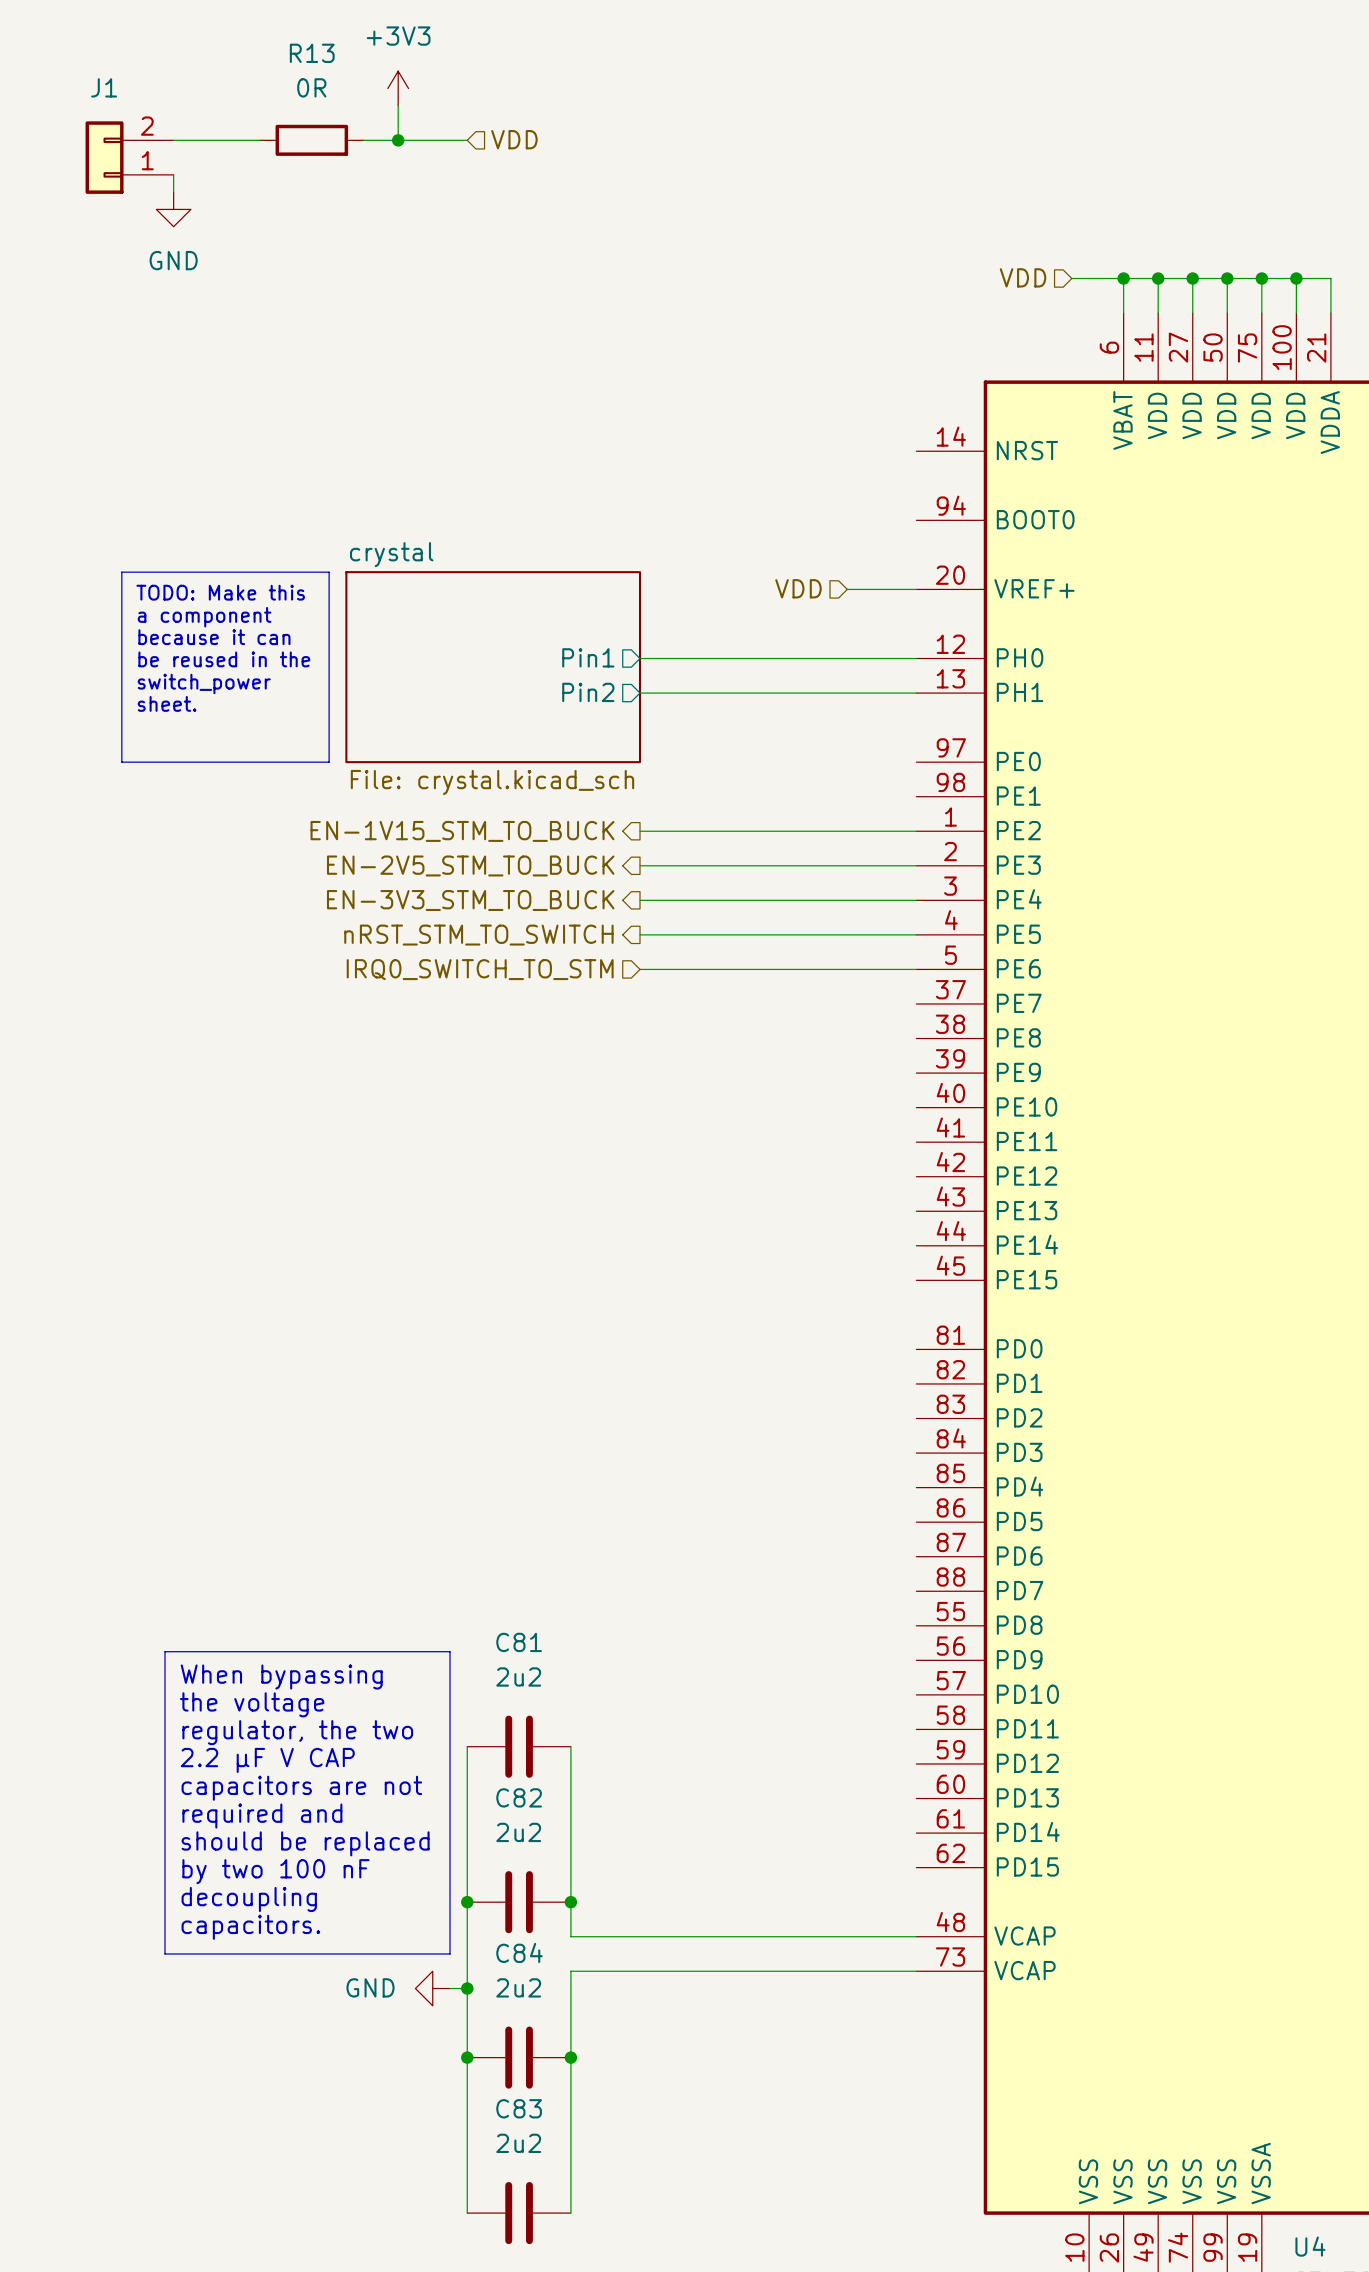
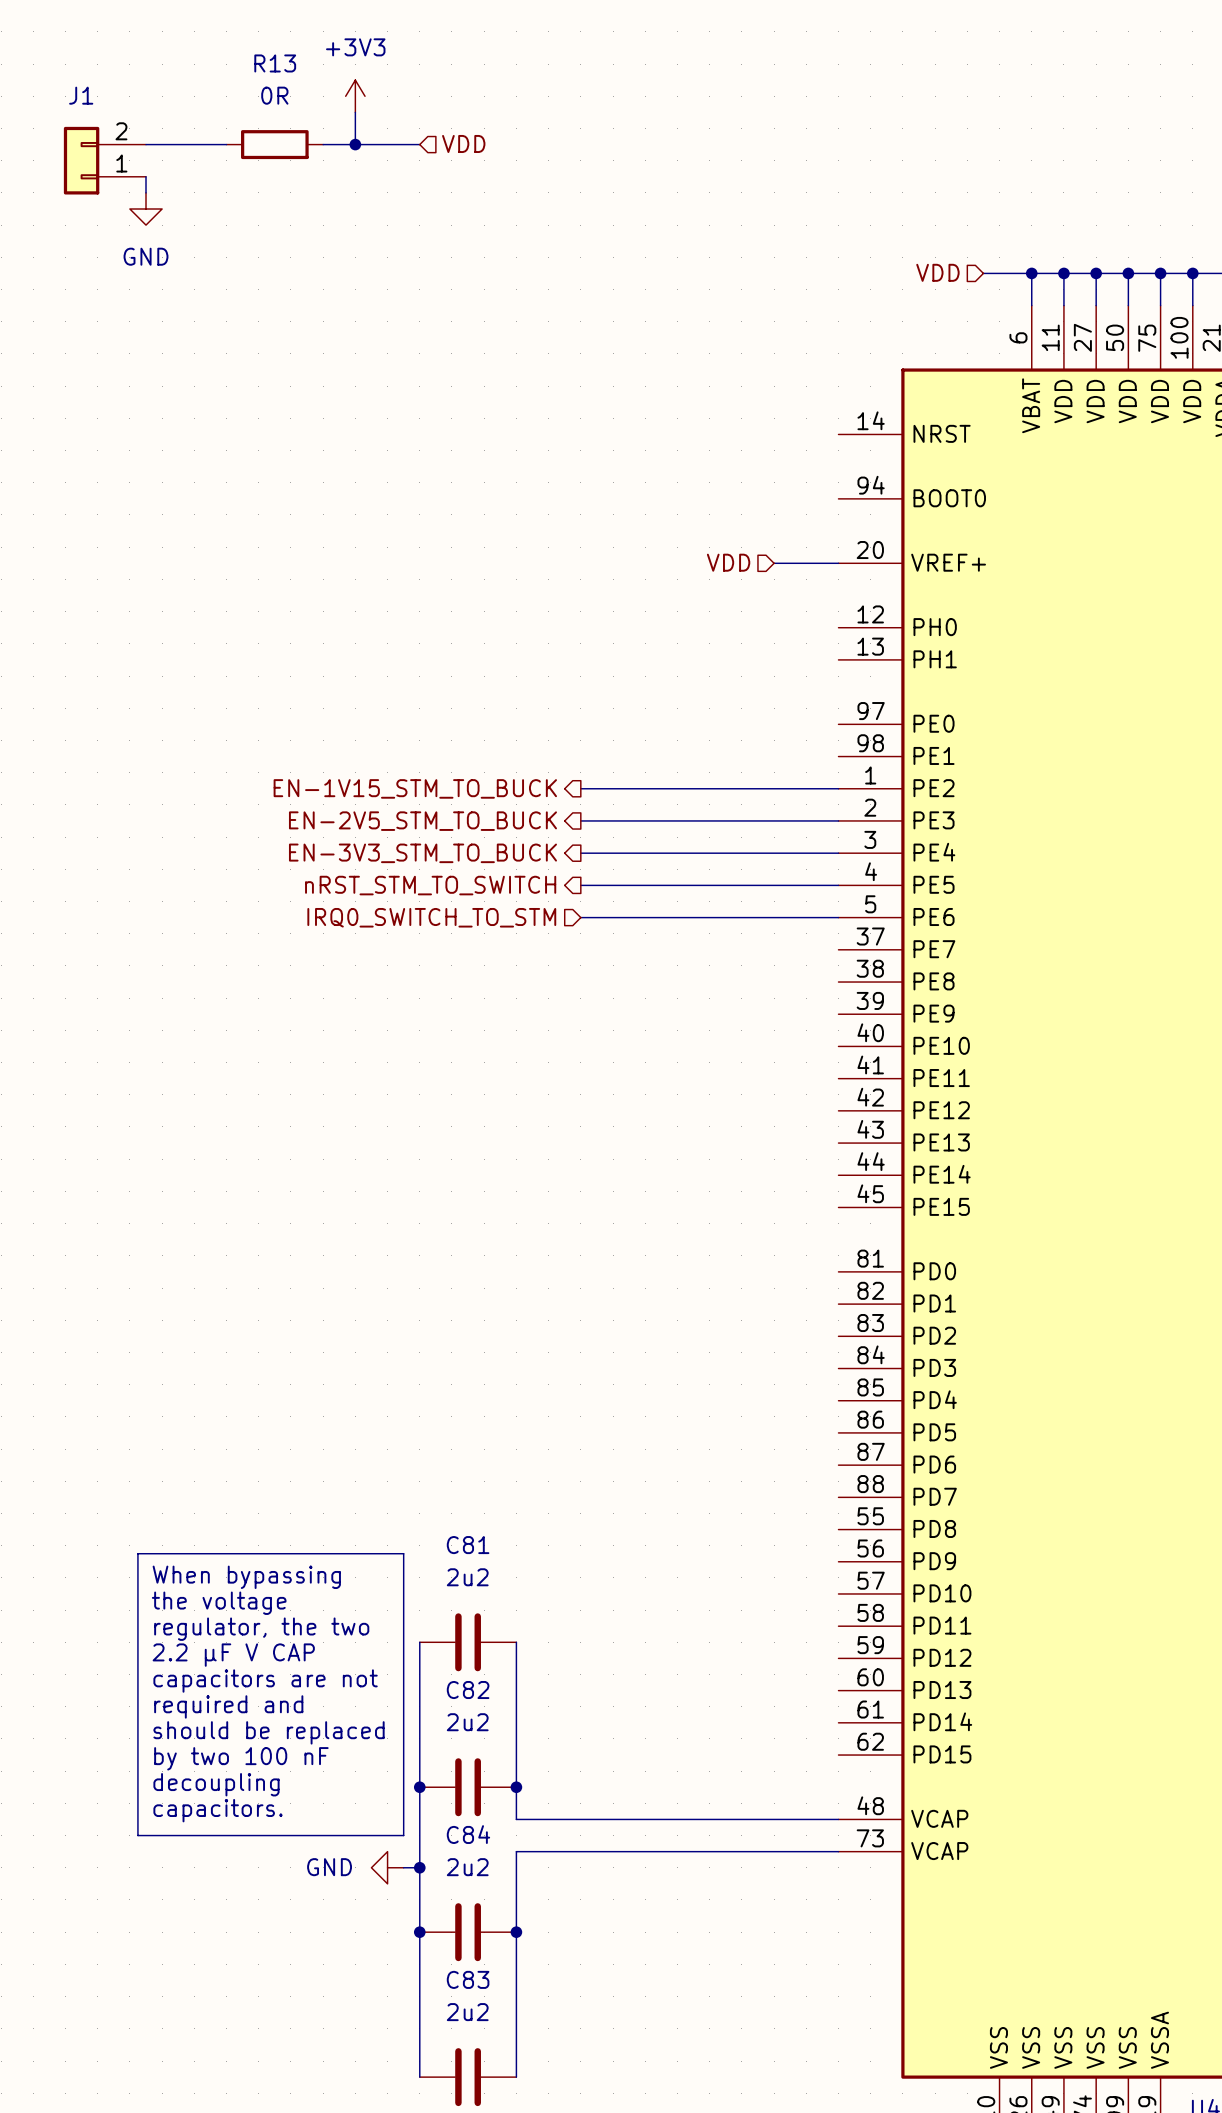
line: (121, 572) (329, 572) (329, 762) (121, 762) (121, 572) -> none
text: TODO: Make this (220, 592) -> none
text: a component (204, 617) -> none
text: because it can (214, 637) -> none
sheet pin: Pin1 (588, 657) -> none
wire: (640, 658) (916, 658) -> none
text: be reused in the (224, 659) -> none
sheet crystal: File: crystal.kicad_sch (493, 667) -> none
text: switch_power (204, 683) -> none
sheet pin: Pin2 (588, 692) -> none
wire: (640, 693) (916, 693) -> none
text: sheet. (167, 703) -> none

